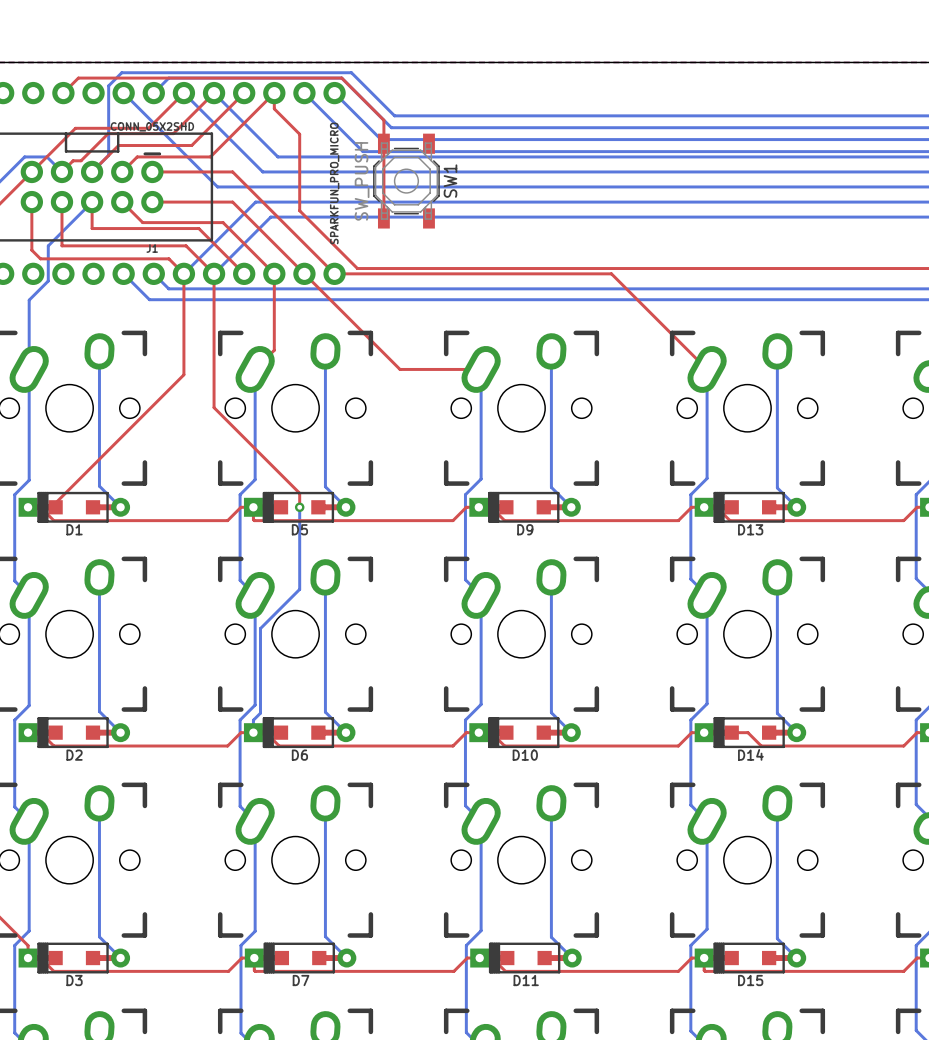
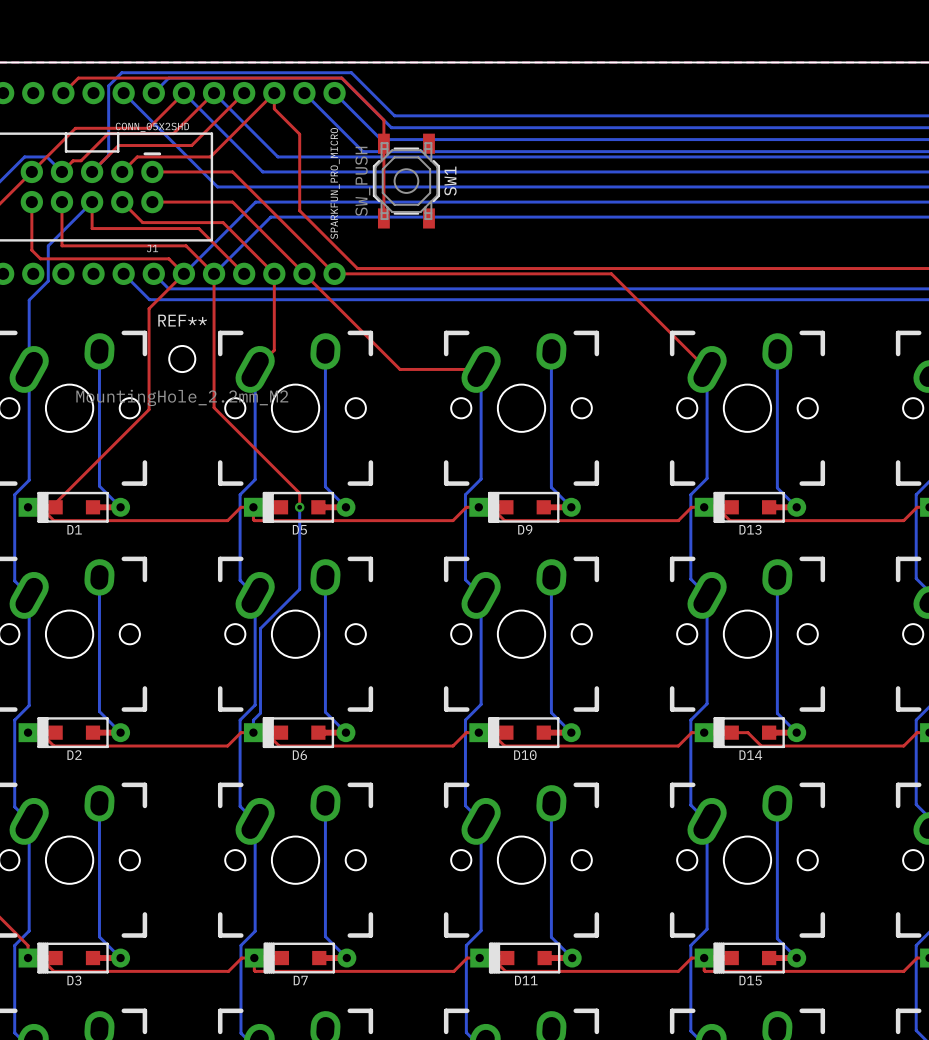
top track: (183, 273) (183, 374) (149, 409) -> (183, 273) (149, 308) (149, 409)
REF**: none -> MountingHole_2.2mm_M2 (182, 359)

